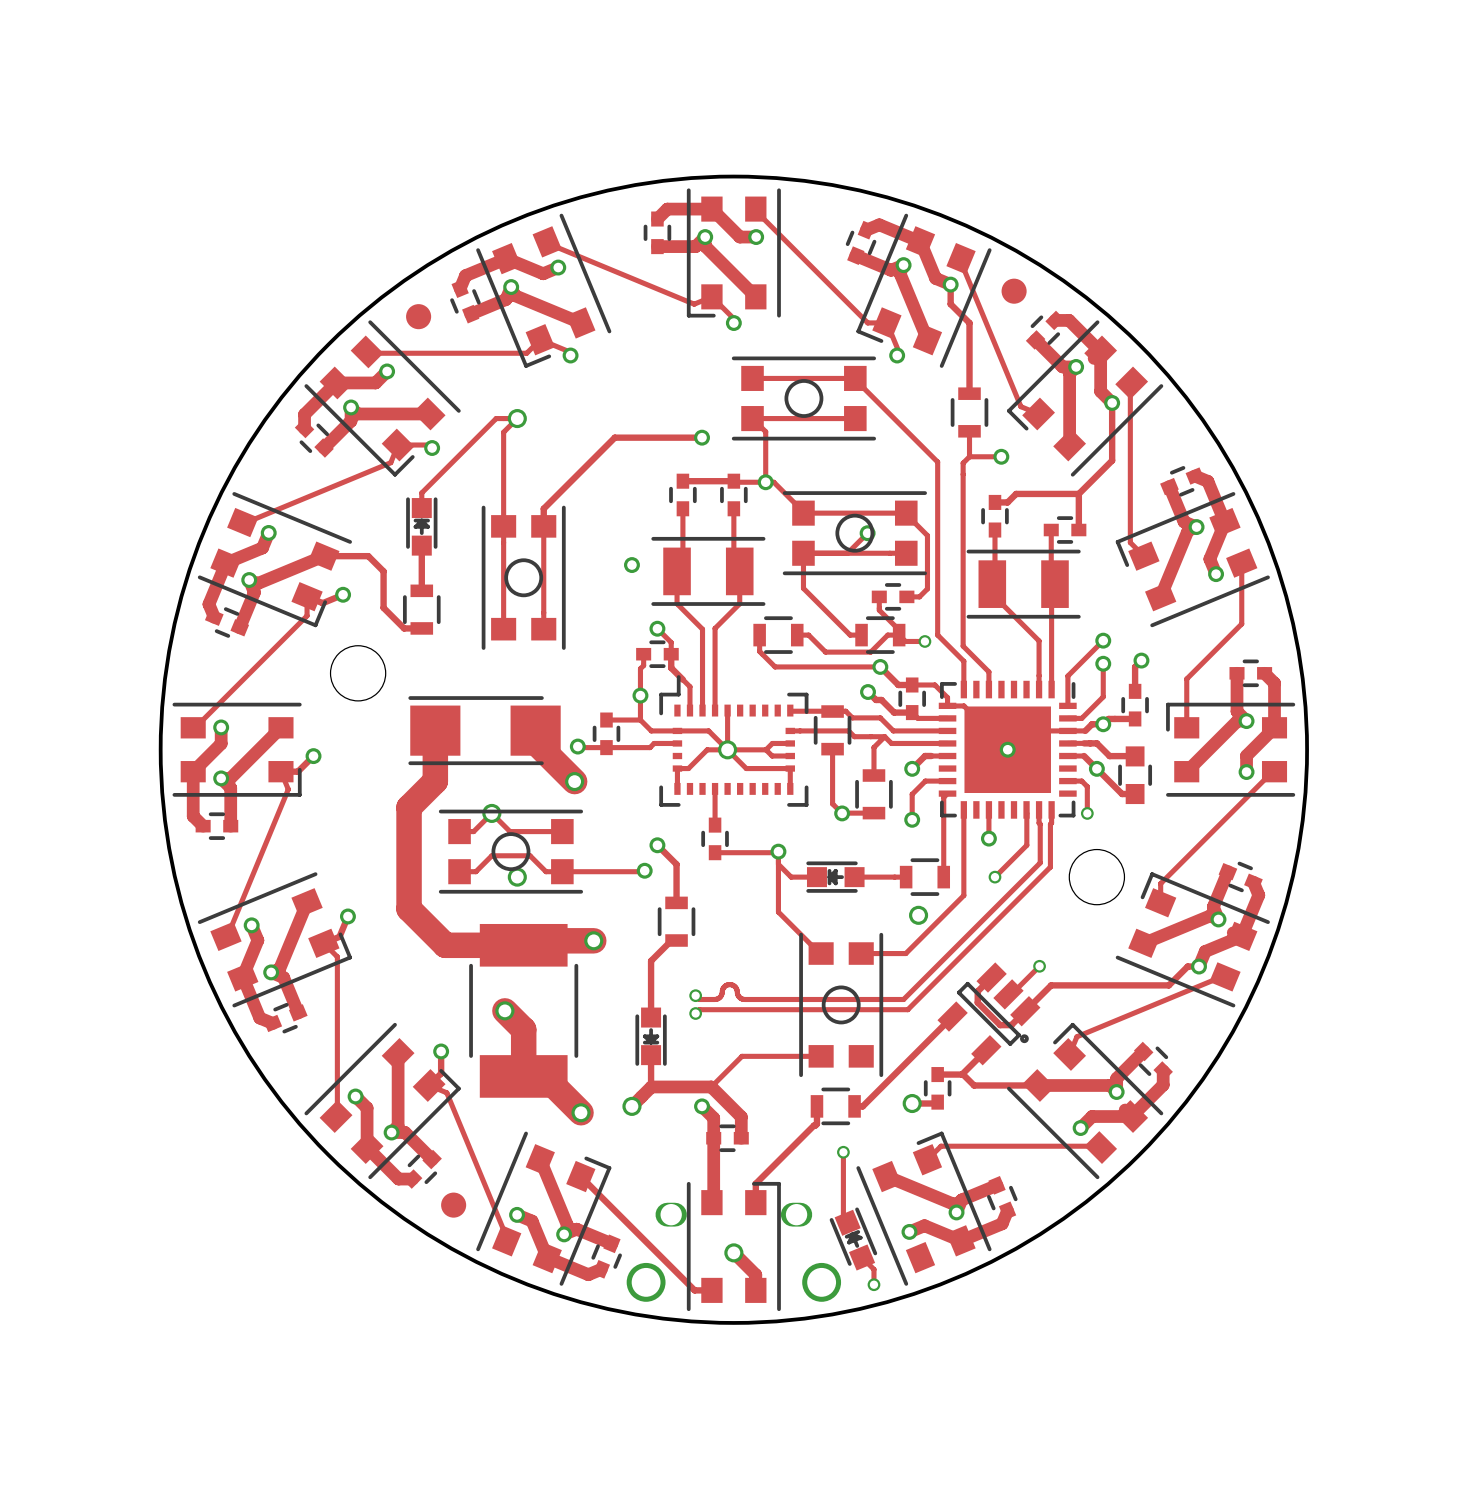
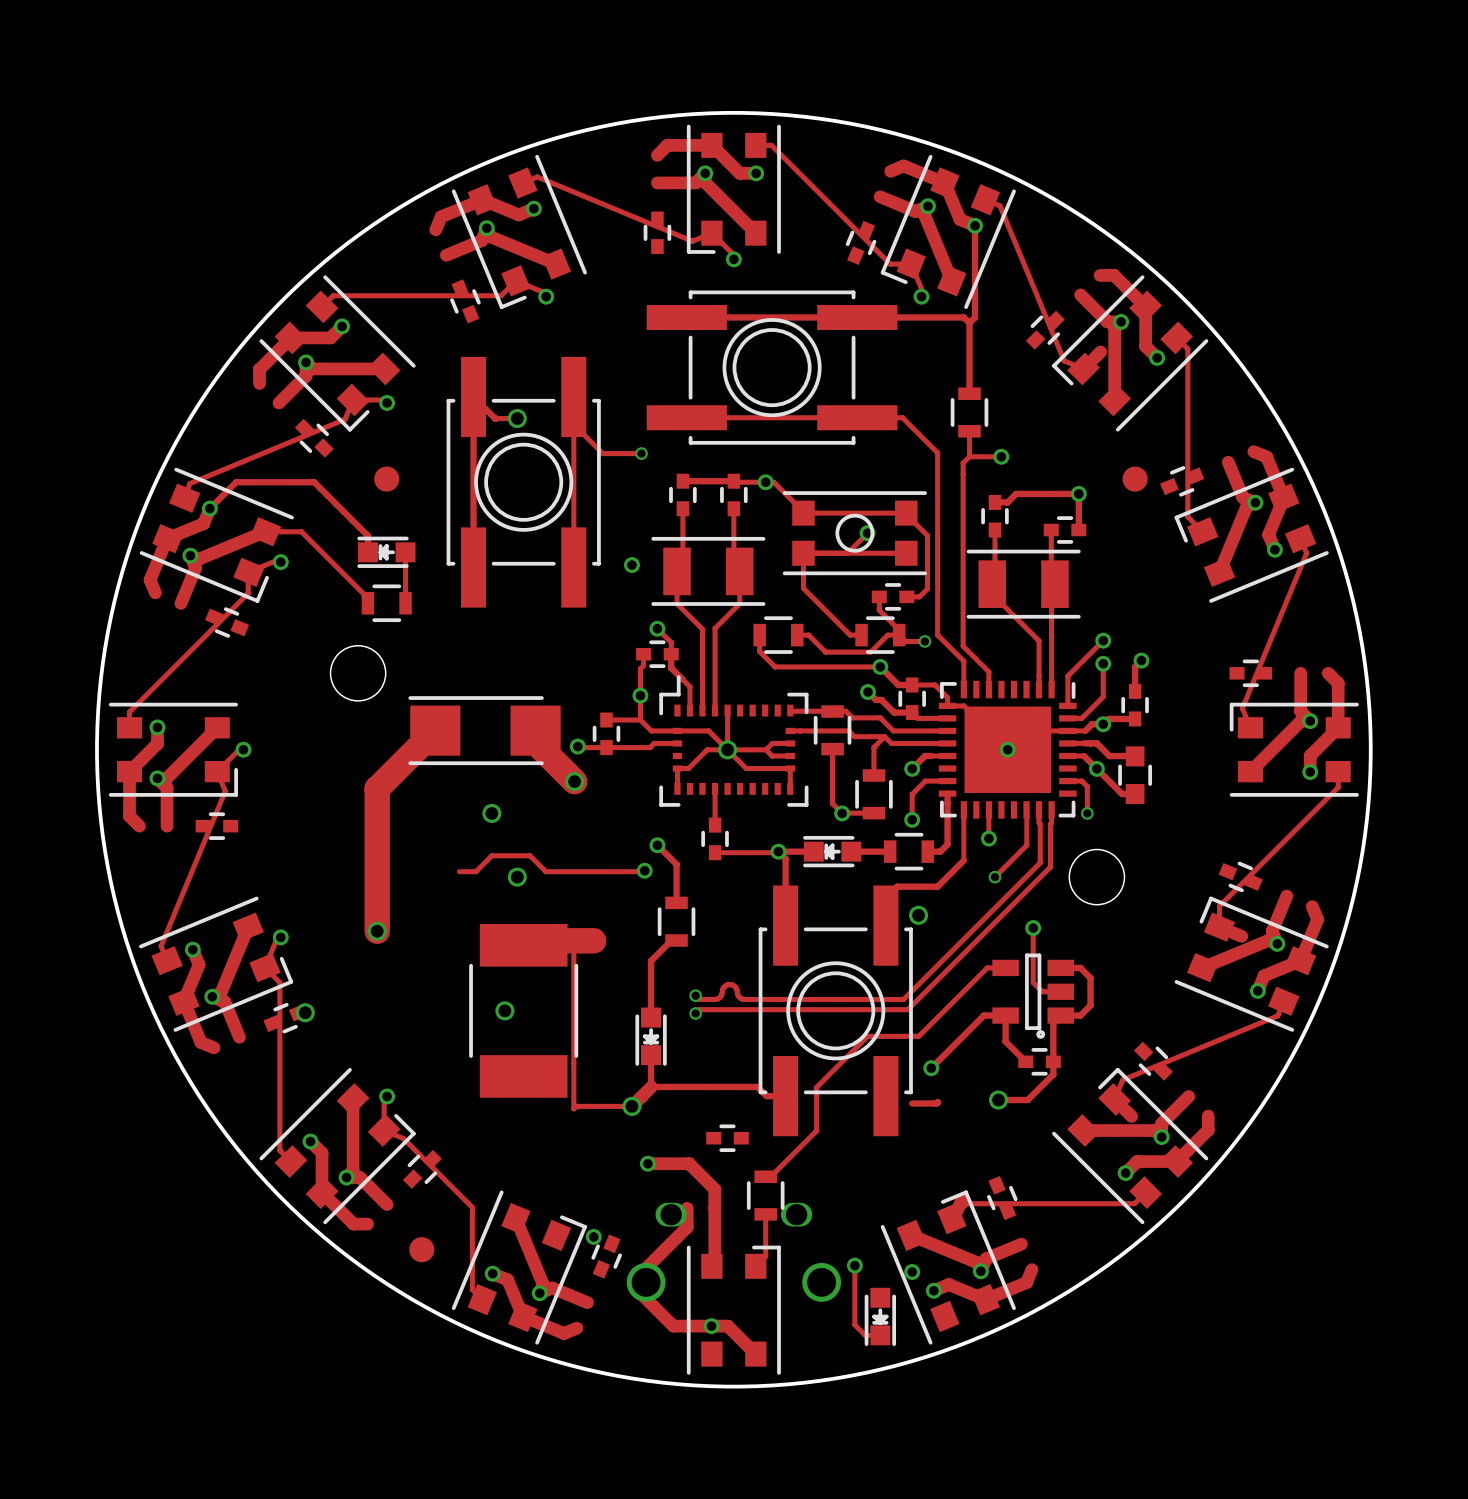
track: none -> (755, 147) (755, 145) (771, 145) (890, 264) (911, 264) (923, 292) (921, 296)
track: none -> (890, 171) (903, 165) (944, 183) (959, 219) (975, 225) (975, 317) (969, 323)
via: none -> (705, 173)
via: none -> (756, 173)
round board edge size: [158, 174, 1309, 1325] -> [95, 110, 1373, 1389]
track: none -> (523, 184) (522, 183) (537, 176) (692, 241) (711, 233) (733, 255) (733, 259)
track: none -> (984, 201) (985, 199) (999, 205) (1064, 360) (1083, 368)
via: none -> (927, 206)
via: none -> (533, 208)
track: (755, 209) (867, 322) (886, 322) (898, 351) (897, 355) -> none
track: (657, 219) (667, 209) (711, 209) (739, 237) (756, 237) -> (657, 155) (667, 145) (711, 145) (739, 173) (756, 173)
via: none -> (975, 225)
via: none -> (486, 228)
track: (866, 230) (879, 224) (920, 241) (935, 278) (950, 284) (950, 304) (963, 317) -> (686, 317) (963, 317)
via: (705, 237) -> none
via: (756, 237) -> none
track: (547, 241) (694, 304) (711, 296) (733, 318) (733, 323) -> none
track: (657, 246) (695, 246) (705, 237) (705, 246) (755, 296) -> (657, 182) (695, 182) (705, 173) (705, 182) (755, 233)
part position: (733, 252) -> (733, 189)
track: (855, 255) (891, 270) (903, 265) (900, 273) (927, 340) -> (880, 196) (915, 211) (927, 206) (924, 214) (951, 280)
track: (961, 258) (1020, 406) (1038, 413) -> none
via: none -> (733, 259)
via: (903, 265) -> none
track: (558, 267) (543, 273) (506, 258) (465, 275) (460, 288) -> (533, 208) (518, 214) (482, 199) (441, 216) (435, 229)
via: (558, 267) -> none
track: none -> (1100, 275) (1114, 275) (1145, 306) (1145, 346) (1157, 357)
via: (950, 284) -> none
via: (511, 287) -> none
part position: (543, 290) -> (519, 231)
part position: (923, 290) -> (948, 231)
part position: (1014, 291) -> (1135, 479)
track: none -> (546, 296) (544, 292) (515, 280) (501, 295) (333, 295) (322, 306) (323, 308)
via: none -> (546, 296)
via: none -> (921, 296)
track: (470, 314) (506, 299) (511, 287) (514, 295) (580, 322) -> (446, 255) (481, 240) (486, 228) (490, 236) (556, 264)
part position: (418, 316) -> (386, 479)
track: (1055, 320) (1069, 320) (1100, 351) (1100, 391) (1112, 402) (1112, 460) (1078, 493) -> none
via: none -> (1121, 321)
via: (733, 323) -> none
via: none -> (342, 326)
track: (1035, 339) (1062, 366) (1076, 366) (1069, 373) (1069, 445) -> (1080, 294) (1107, 321) (1121, 321) (1114, 328) (1114, 399)
track: none -> (1175, 339) (1176, 337) (1187, 349) (1187, 516) (1202, 531)
track: (367, 351) (526, 353) (540, 339) (568, 351) (570, 355) -> none
via: (570, 355) -> none
via: (897, 355) -> none
via: none -> (1157, 357)
via: none -> (306, 362)
via: (1076, 366) -> none
part: none -> (772, 367)
track: (387, 371) (375, 382) (336, 382) (304, 414) (304, 428) -> (342, 326) (330, 337) (291, 337) (259, 369) (259, 383)
via: (387, 371) -> none
track: (752, 378) (855, 378) (937, 462) -> (686, 417) (902, 417) (937, 452) (937, 462)
track: (1131, 382) (1130, 542) (1143, 556) -> none
track: none -> (573, 396) (573, 567)
part position: (382, 398) -> (337, 353)
part: (803, 398) -> none
part position: (1085, 398) -> (1130, 353)
track: none -> (387, 402) (384, 399) (353, 399) (345, 419) (189, 483) (183, 498) (185, 498)
via: none -> (387, 402)
via: (1112, 402) -> none
via: (351, 407) -> none
track: (429, 413) (357, 413) (351, 407) (351, 420) (324, 448) -> (384, 368) (312, 368) (306, 362) (306, 375) (279, 402)
track: (496, 418) (421, 492) (421, 508) -> (496, 418) (473, 396) (473, 567)
track: (517, 418) (503, 432) (503, 629) -> none
track: (855, 418) (752, 418) (765, 431) (765, 482) -> none
track: none -> (573, 424) (602, 453) (641, 453)
track: (702, 437) (614, 437) (543, 508) (543, 629) -> none
via: (702, 437) -> none
track: (432, 448) (429, 445) (398, 445) (390, 462) (244, 523) -> none
via: (432, 448) -> none
via: none -> (641, 453)
track: (1194, 476) (1207, 481) (1224, 522) (1209, 559) (1216, 574) -> (1253, 451) (1266, 457) (1283, 498) (1268, 534) (1274, 549)
part: none -> (523, 482)
track: (1169, 486) (1184, 521) (1196, 527) (1188, 530) (1160, 597) -> (1228, 462) (1242, 497) (1255, 502) (1246, 506) (1219, 572)
via: none -> (1078, 493)
via: none -> (1255, 502)
via: none -> (209, 508)
part rotation: 0° (421, 526) -> 90° counterclockwise (386, 552)
part position: (421, 526) -> (386, 552)
via: (1196, 527) -> none
track: none -> (265, 531) (198, 559) (190, 555) (195, 568) (180, 603)
track: none -> (265, 531) (301, 531) (367, 598) (367, 603)
track: (268, 532) (262, 547) (225, 563) (208, 604) (214, 617) -> none
via: (268, 532) -> none
track: none -> (1298, 539) (1300, 538) (1306, 553) (1242, 708) (1250, 727)
track: (421, 545) (421, 590) -> none
via: none -> (1274, 549)
track: none -> (367, 552) (367, 535) (314, 482) (236, 482) (209, 508) (203, 523) (167, 538) (150, 579) (155, 592)
track: none -> (405, 552) (405, 603)
via: none -> (190, 555)
part position: (274, 559) -> (216, 535)
part position: (1192, 559) -> (1251, 535)
track: none -> (280, 562) (276, 560) (248, 572) (248, 593) (129, 712) (129, 727) (131, 727)
via: none -> (280, 562)
track: (1241, 563) (1241, 623) (1186, 678) (1186, 727) -> none
via: (1216, 574) -> none
part: (523, 577) -> none
via: (249, 580) -> none
track: (343, 594) (322, 603) (307, 596) (307, 615) (195, 727) -> none
via: (343, 594) -> none
part rotation: 0° (421, 609) -> 90° clockwise (386, 603)
part position: (421, 609) -> (386, 603)
track: (239, 627) (254, 592) (249, 580) (257, 583) (323, 556) (368, 556) (383, 571) (383, 607) (404, 628) (421, 628) -> none
track: (1237, 673) (1237, 711) (1246, 721) (1237, 721) (1186, 772) -> (1300, 673) (1300, 711) (1310, 721) (1301, 721) (1250, 771)
track: (1264, 673) (1274, 683) (1274, 727) (1246, 755) (1246, 772) -> (1328, 673) (1338, 683) (1338, 727) (1310, 755) (1310, 772)
via: (1246, 721) -> none
via: none -> (1310, 721)
via: none -> (157, 727)
track: (221, 727) (221, 743) (193, 771) (193, 816) (203, 826) -> (157, 727) (157, 743) (129, 771) (129, 816) (139, 826)
via: (221, 727) -> none
track: (280, 727) (230, 778) (221, 778) (230, 787) (230, 826) -> (217, 727) (166, 778) (157, 778) (167, 787) (167, 826)
track: (435, 730) (435, 781) (409, 807) (409, 908) (445, 945) (523, 945) (519, 940) -> (435, 730) (377, 788) (377, 931)
part position: (237, 749) -> (173, 749)
track: none -> (243, 749) (239, 749) (217, 771) (225, 791) (161, 946) (167, 960) (168, 960)
via: none -> (243, 749)
part position: (1230, 749) -> (1294, 749)
track: (313, 756) (297, 771) (280, 771) (288, 789) (227, 935) -> none
via: (313, 756) -> none
track: (1274, 771) (1160, 883) (1160, 902) -> none
track: none -> (1336, 771) (1338, 771) (1338, 787) (1219, 906) (1219, 927)
via: (1246, 772) -> none
via: none -> (1310, 772)
via: none -> (157, 778)
via: (221, 778) -> none
track: (947, 793) (943, 797) (943, 877) -> (947, 793) (947, 844) (940, 851) (927, 851)
track: (459, 831) (473, 831) (491, 813) (510, 831) (562, 831) -> none
part: (510, 851) -> none
track: (778, 851) (778, 912) (821, 953) -> none
track: none -> (813, 851) (778, 851) (785, 858) (785, 925)
track: none -> (851, 851) (890, 851)
track: (963, 860) (963, 895) (905, 953) (861, 953) -> (963, 860) (937, 886) (897, 886) (885, 898) (885, 925)
track: (778, 864) (791, 877) (816, 877) -> none
track: (1227, 871) (1213, 906) (1218, 919) (1209, 915) (1143, 943) -> (1286, 896) (1272, 931) (1277, 943) (1268, 940) (1202, 967)
part position: (835, 877) -> (832, 851)
track: (854, 877) (906, 877) -> none
part position: (924, 877) -> (909, 851)
track: (1253, 882) (1258, 895) (1241, 936) (1205, 951) (1199, 966) (1187, 966) (1168, 985) (1051, 985) (1011, 1025) (1000, 1025) (977, 1002) (977, 991) (991, 977) -> none
track: (307, 902) (279, 968) (271, 972) (283, 977) (298, 1012) -> (248, 927) (220, 993) (212, 996) (224, 1001) (239, 1037)
track: none -> (1312, 906) (1317, 919) (1300, 960) (1264, 975) (1257, 990)
track: (347, 916) (339, 936) (323, 943) (337, 956) (337, 1115) -> none
via: (347, 916) -> none
via: (1218, 919) -> none
track: (251, 925) (257, 940) (242, 976) (259, 1018) (272, 1023) -> (192, 949) (199, 964) (183, 1001) (200, 1042) (213, 1047)
via: (251, 925) -> none
track: none -> (1033, 928) (1033, 982) (1042, 991) (1060, 991)
via: none -> (1033, 928)
via: none -> (377, 931)
part footprint: [799, 932, 884, 1078] -> [758, 885, 913, 1137]
track: none -> (280, 937) (276, 939) (265, 967) (279, 982) (279, 1150) (291, 1161) (292, 1160)
via: none -> (280, 937)
track: none -> (573, 938) (573, 1108) (576, 1106) (631, 1106)
part position: (274, 939) -> (216, 964)
part position: (1192, 939) -> (1251, 964)
via: (593, 940) -> none
via: none -> (1277, 943)
via: none -> (192, 949)
track: (1039, 966) (1011, 994) (1008, 994) -> none
via: (1039, 966) -> none
via: (1199, 966) -> none
track: none -> (1005, 967) (987, 967) (918, 1036) (867, 1036) (816, 1087) (816, 1130) (770, 1176) (765, 1176)
track: none -> (1060, 967) (1080, 967) (1090, 978) (1090, 1005) (1080, 1015) (1060, 1015) (1053, 1023) (1053, 1074) (1027, 1100) (998, 1100)
via: (271, 972) -> none
track: (1223, 976) (1076, 1036) (1069, 1054) -> none
via: none -> (1257, 990)
via: none -> (212, 996)
part: none -> (1033, 996)
track: none -> (1282, 1000) (1283, 1001) (1277, 1015) (1122, 1080) (1114, 1099)
track: (504, 1010) (523, 1029) (523, 1076) (544, 1076) (581, 1112) -> none
via: none -> (305, 1012)
part: (988, 1013) -> none
track: (952, 1016) (862, 1106) (854, 1106) -> none
track: (986, 1050) (961, 1074) -> none
track: (441, 1051) (441, 1073) (429, 1085) (446, 1092) (507, 1239) -> none
via: (441, 1051) -> none
track: (1143, 1051) (1116, 1078) (1116, 1092) (1110, 1085) (1038, 1085) -> (1188, 1096) (1161, 1123) (1161, 1137) (1155, 1130) (1083, 1130)
track: (398, 1054) (398, 1126) (391, 1132) (405, 1132) (432, 1159) -> (353, 1099) (353, 1171) (346, 1177) (360, 1177) (387, 1204)
track: (821, 1056) (741, 1056) (711, 1086) (741, 1116) (741, 1138) -> none
track: none -> (1025, 1061) (1005, 1041) (1005, 1015) (983, 1015) (931, 1068)
via: none -> (931, 1068)
track: (1163, 1070) (1163, 1085) (1131, 1116) (1092, 1116) (1080, 1128) -> (1208, 1116) (1208, 1130) (1176, 1161) (1137, 1161) (1125, 1173)
track: (937, 1074) (963, 1074) (974, 1085) (1038, 1085) -> none
track width: thick (651, 1086) (711, 1086) -> thin (651, 1086) (711, 1086)
track: none -> (711, 1086) (757, 1086) (766, 1096) (785, 1096)
part rotation: 0° (937, 1088) -> 90° clockwise (1039, 1061)
part position: (937, 1088) -> (1039, 1061)
via: (1116, 1092) -> none
track: (355, 1096) (367, 1108) (367, 1147) (398, 1179) (412, 1179) -> (310, 1141) (322, 1153) (322, 1192) (353, 1224) (367, 1224)
via: (355, 1096) -> none
track: none -> (387, 1096) (384, 1099) (384, 1130) (403, 1138) (472, 1207) (472, 1289) (482, 1299)
via: none -> (387, 1096)
part position: (382, 1101) -> (337, 1146)
part position: (1085, 1101) -> (1130, 1146)
via position: (912, 1103) -> (998, 1100)
track: (702, 1106) (713, 1118) (713, 1200) -> none
via: (702, 1106) -> none
track: (816, 1106) (816, 1124) (755, 1183) (755, 1202) -> none
part rotation: 0° (835, 1106) -> 90° clockwise (765, 1195)
part position: (835, 1106) -> (765, 1195)
via: (581, 1112) -> none
via: (1080, 1128) -> none
via: (391, 1132) -> none
via: none -> (1161, 1137)
via: none -> (310, 1141)
track: (1099, 1146) (940, 1146) (927, 1159) -> none
track: (843, 1152) (843, 1218) (847, 1222) -> none
via: (843, 1152) -> none
track: (540, 1159) (567, 1225) (564, 1234) (576, 1229) (611, 1243) -> (515, 1218) (543, 1284) (539, 1293) (552, 1288) (587, 1302)
track: none -> (647, 1163) (689, 1163) (714, 1189) (714, 1263) (711, 1266)
via: none -> (647, 1163)
via: none -> (1125, 1173)
track: (580, 1176) (694, 1290) (711, 1290) -> none
track: (886, 1176) (953, 1203) (957, 1203) (961, 1199) (997, 1185) -> none
via: none -> (346, 1177)
track: none -> (1144, 1191) (1145, 1192) (1134, 1203) (966, 1203) (951, 1218)
part position: (453, 1205) -> (421, 1249)
part position: (543, 1208) -> (519, 1267)
track: none -> (687, 1208) (687, 1227) (638, 1276) (638, 1291) (673, 1326) (727, 1326) (755, 1354)
part position: (923, 1208) -> (948, 1267)
track: (1007, 1210) (1002, 1223) (961, 1240) (924, 1225) (909, 1231) -> (1031, 1269) (1026, 1282) (985, 1299) (948, 1284) (933, 1290)
via: (956, 1212) -> none
track: (517, 1214) (532, 1221) (547, 1257) (588, 1274) (601, 1269) -> (492, 1273) (507, 1279) (522, 1316) (564, 1333) (577, 1328)
via: (517, 1214) -> none
track: none -> (765, 1214) (765, 1256) (755, 1266)
via: (909, 1231) -> none
via position: (564, 1234) -> (593, 1236)
track: none -> (911, 1235) (977, 1262) (980, 1271) (986, 1258) (1021, 1244)
part: (853, 1239) -> none
part position: (733, 1246) -> (733, 1310)
track: (733, 1252) (755, 1274) (755, 1290) -> none
via: (733, 1252) -> none
track: (862, 1257) (873, 1269) (873, 1284) -> none
track: none -> (854, 1265) (854, 1324) (865, 1335) (880, 1335)
via: none -> (854, 1265)
via: none -> (912, 1271)
via: none -> (980, 1271)
via: none -> (492, 1273)
via: (873, 1284) -> none
via: none -> (933, 1290)
via: none -> (539, 1293)
part: none -> (880, 1316)
via: none -> (711, 1326)

